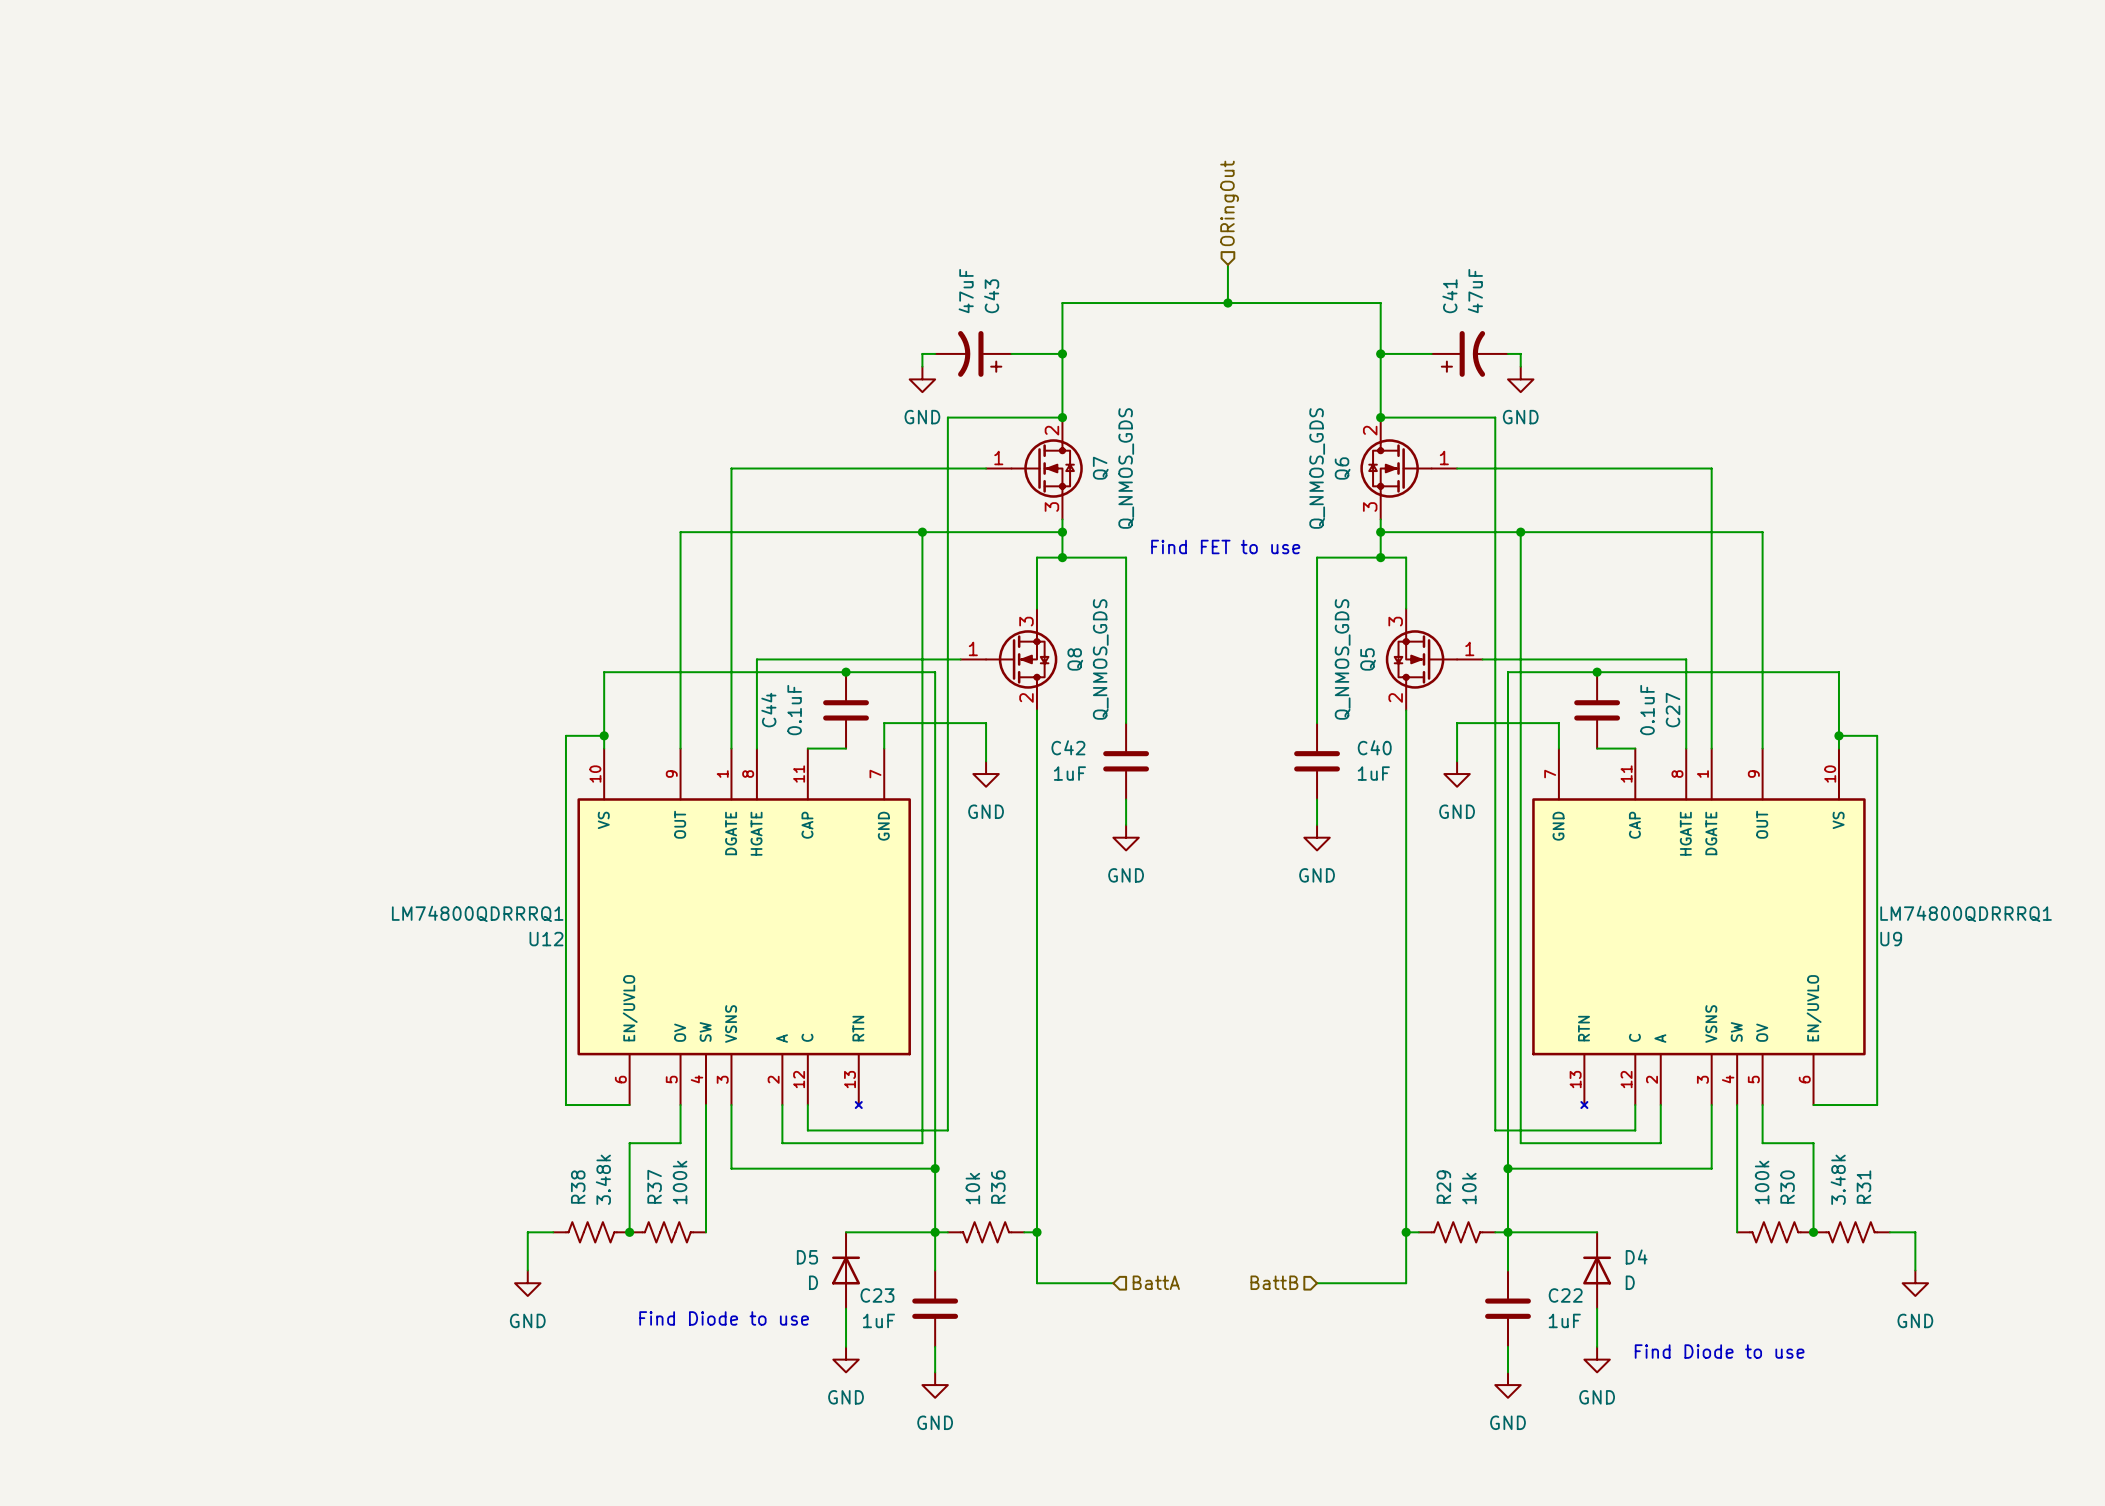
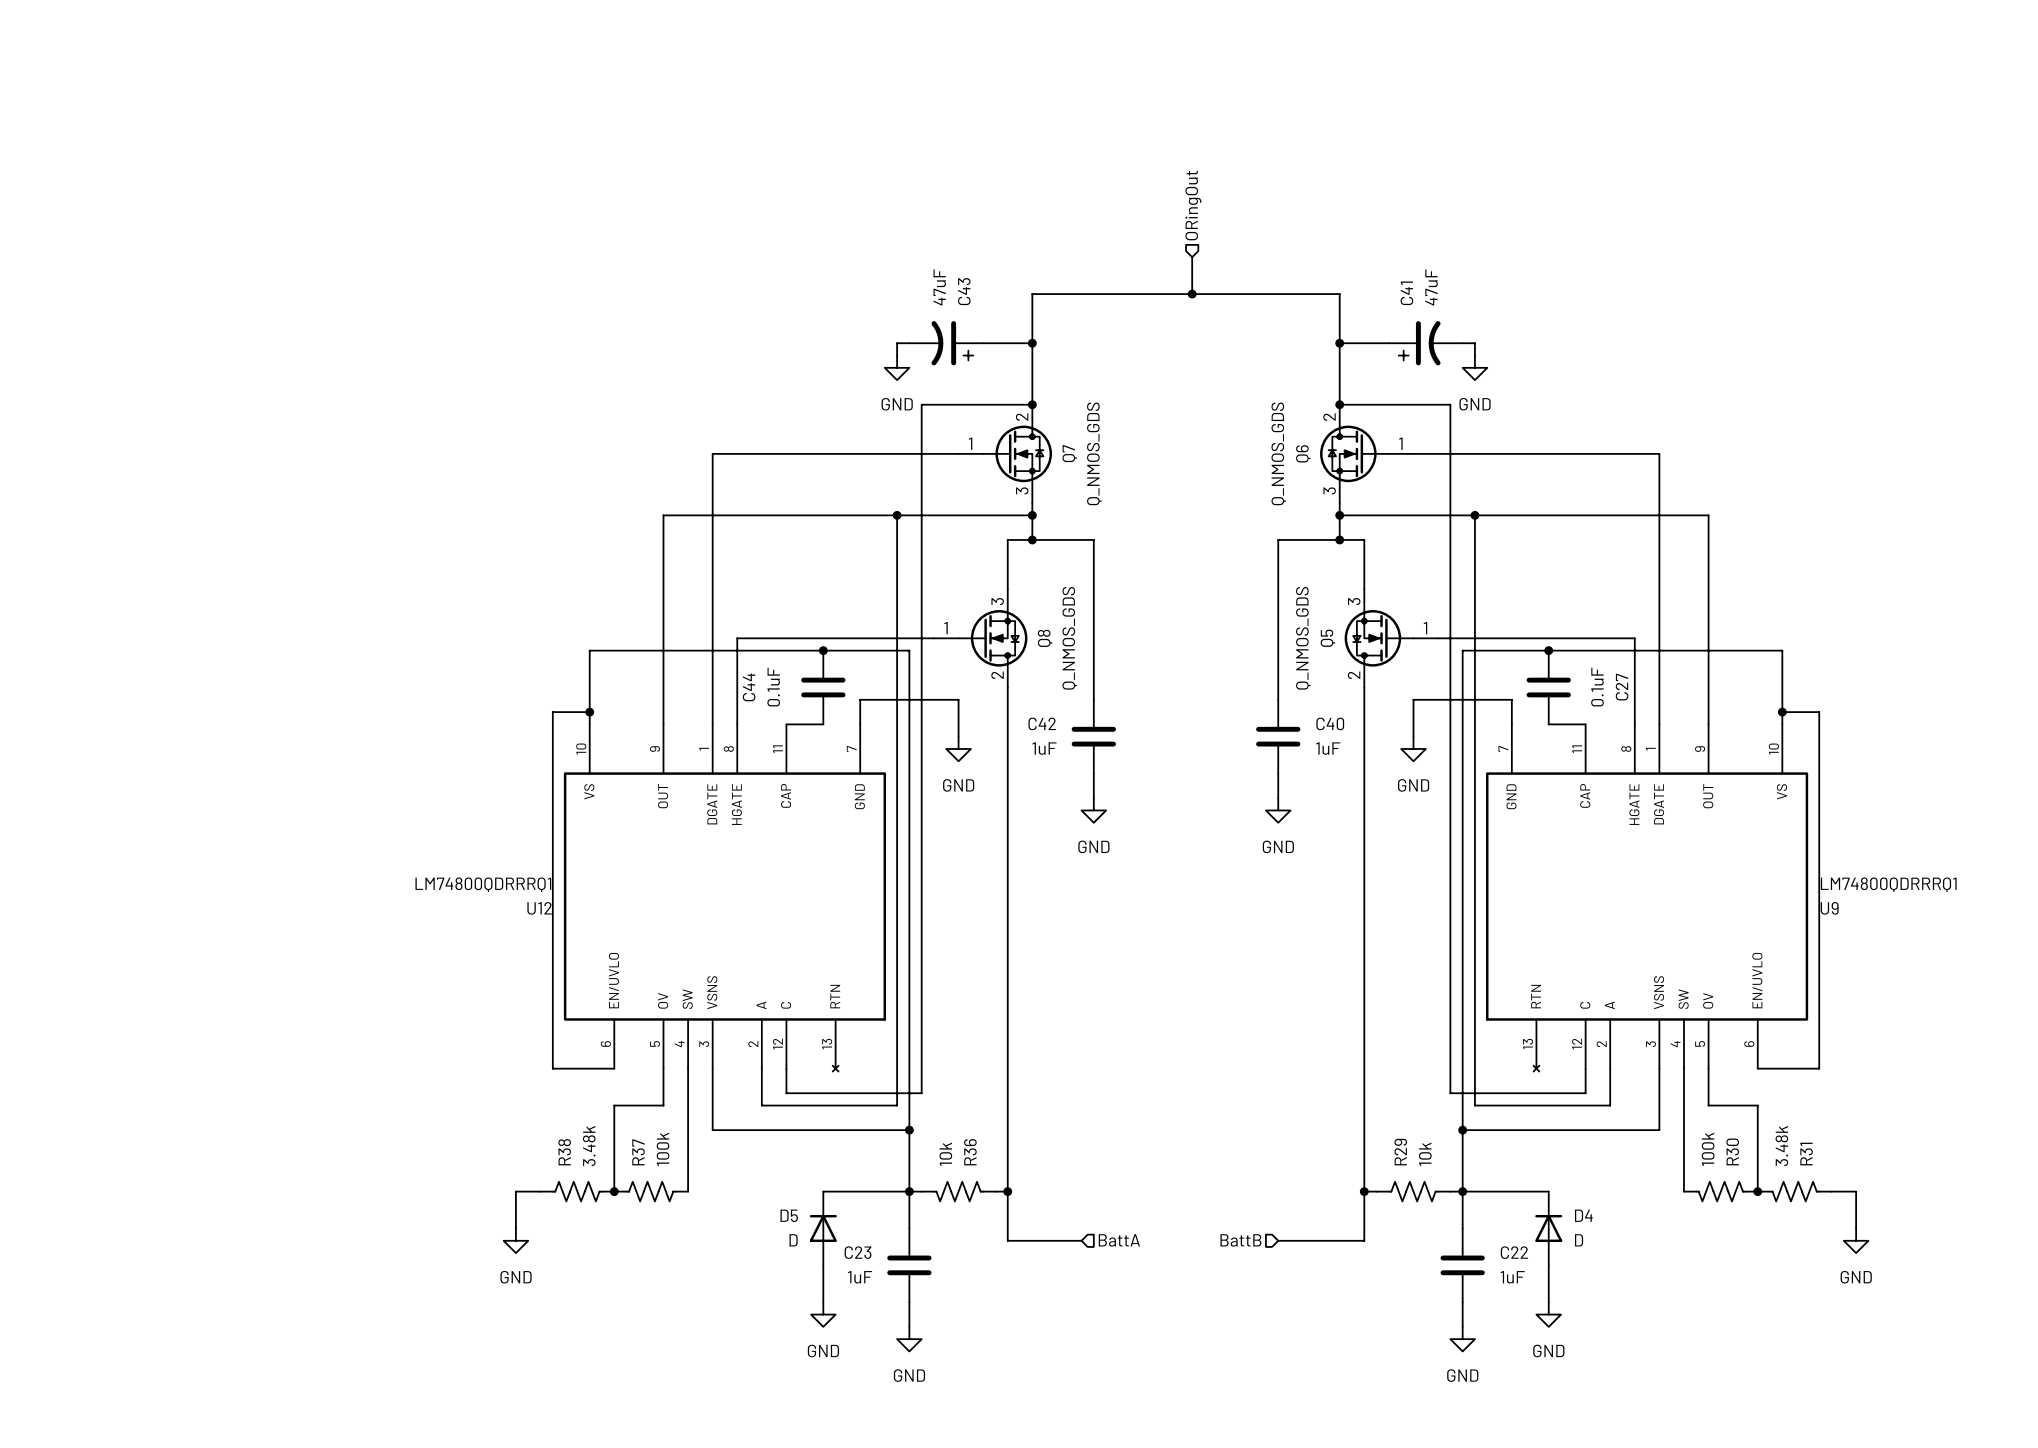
text: Find FET to use (1225, 547) -> none
text: Find Diode to use (724, 1318) -> none
text: Find Diode to use (1719, 1351) -> none

